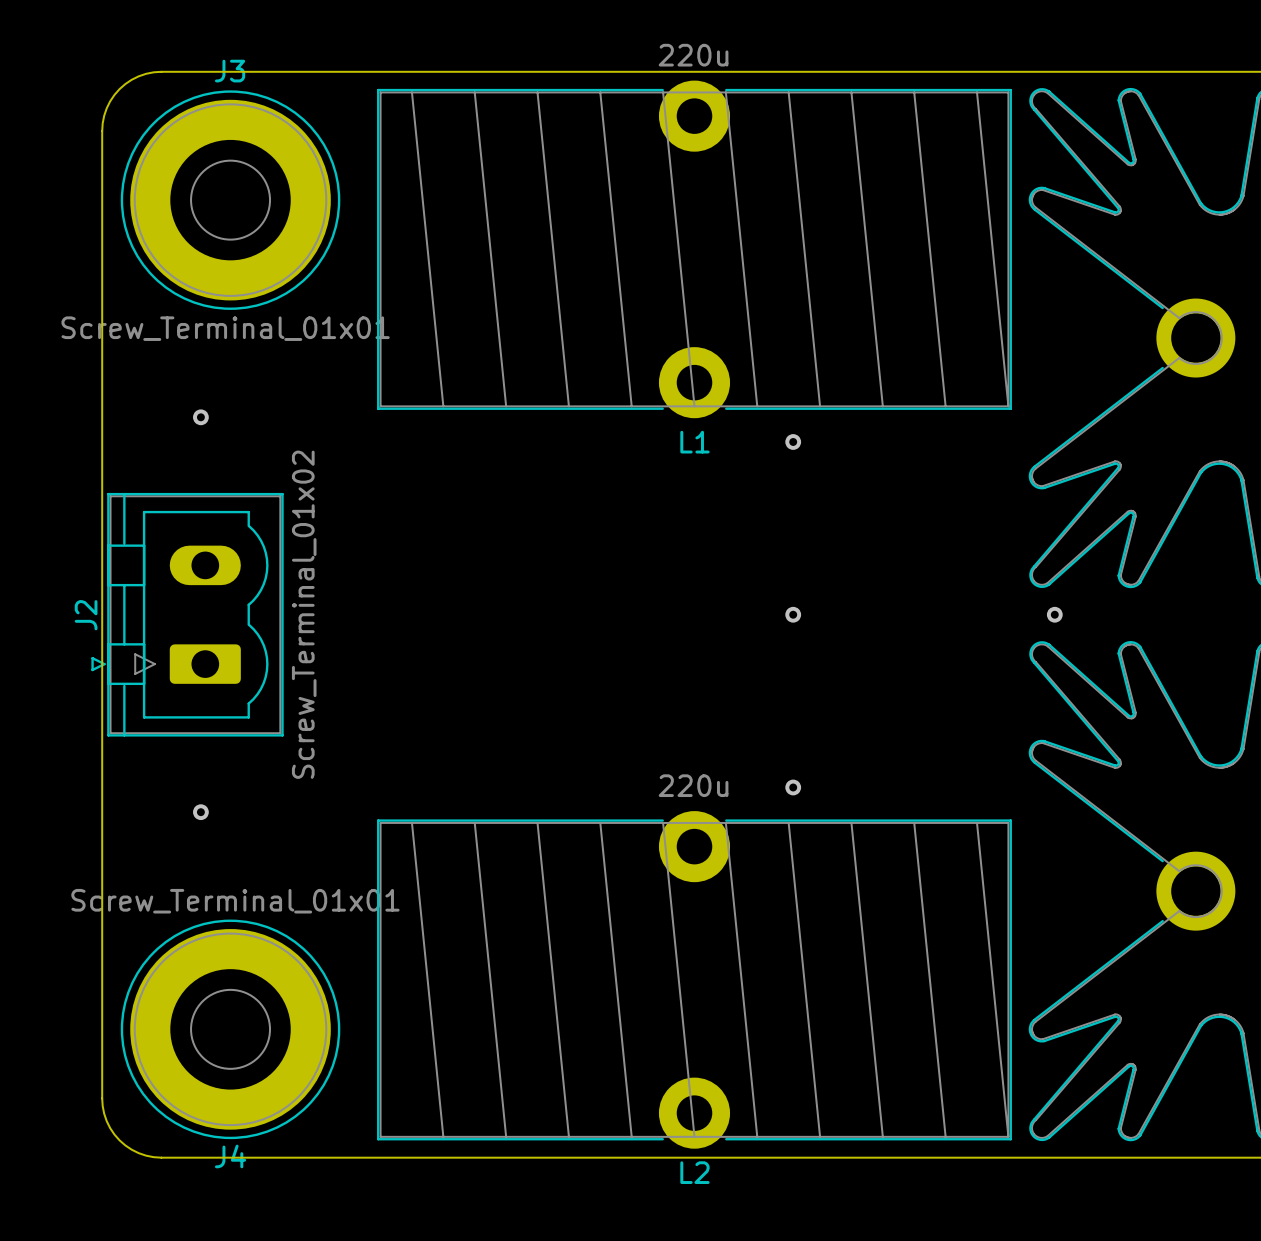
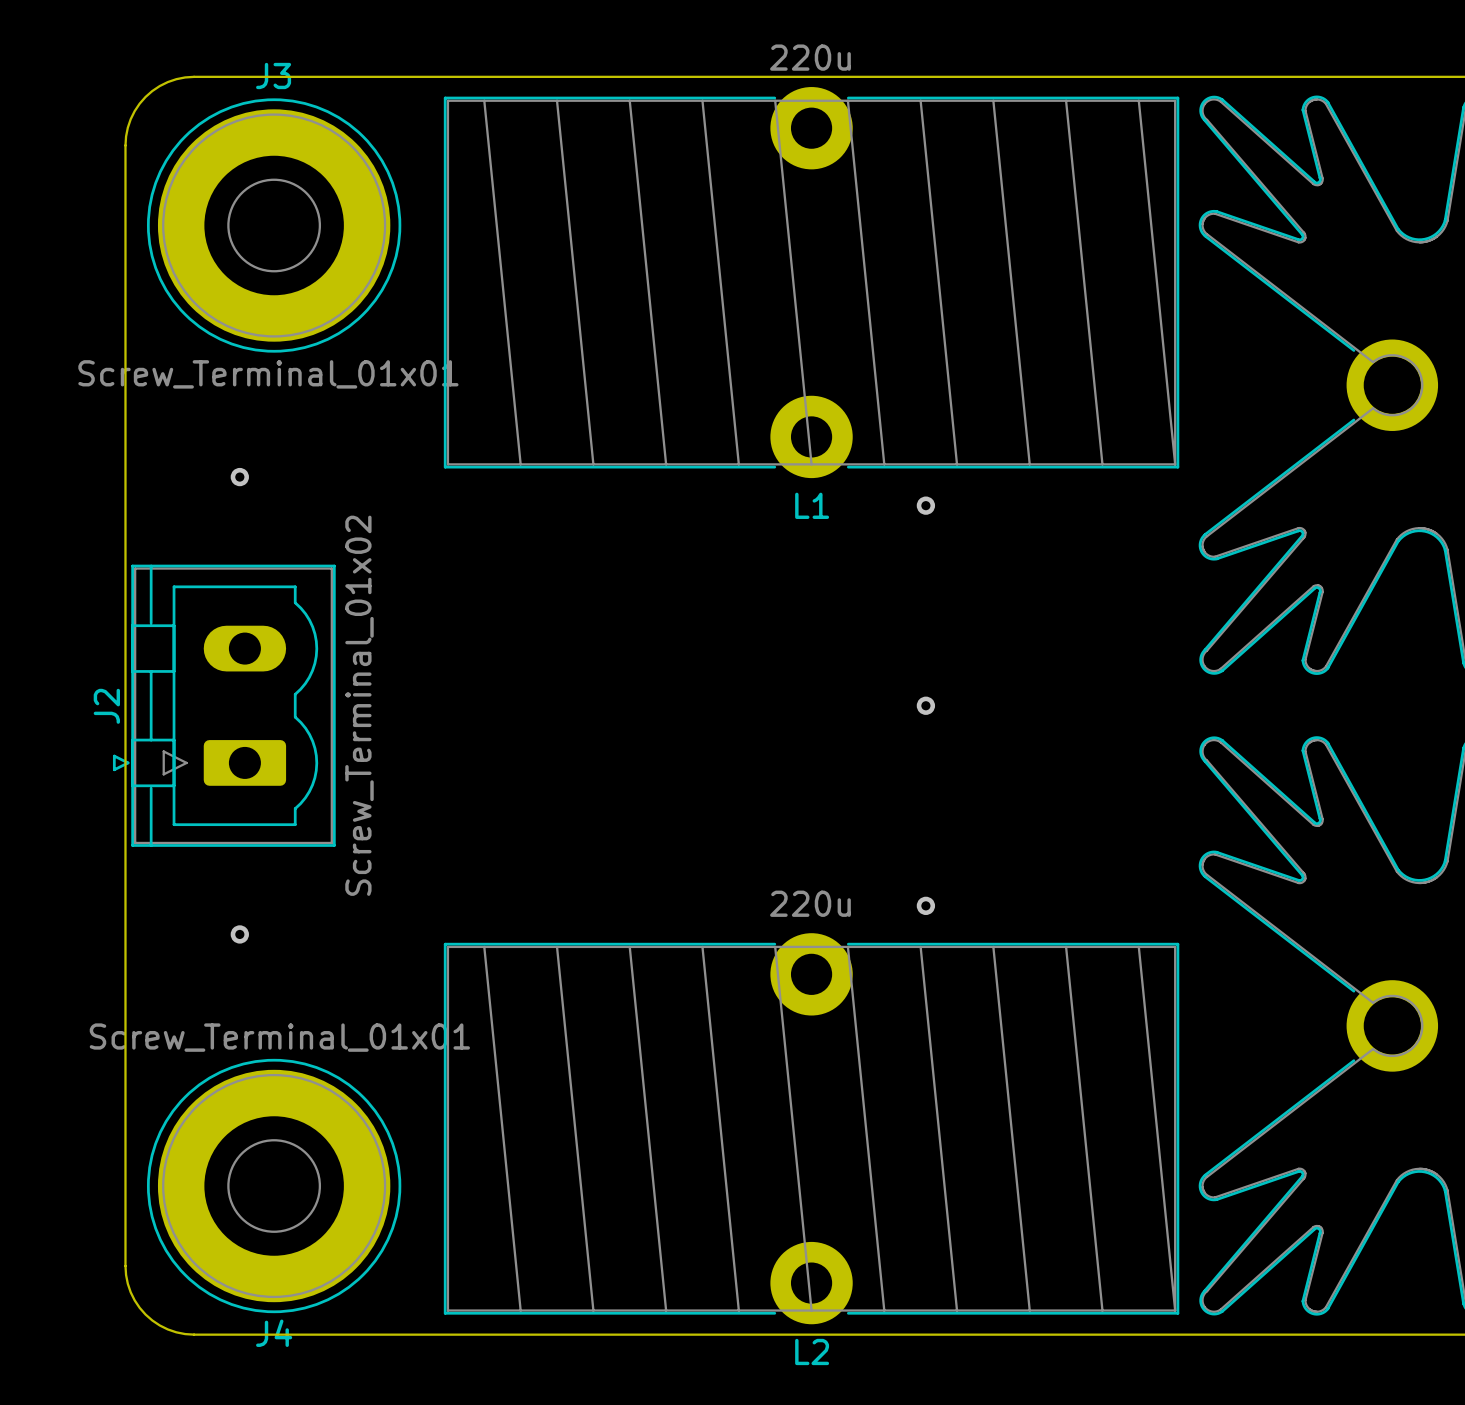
via: (1054, 614) -> none

